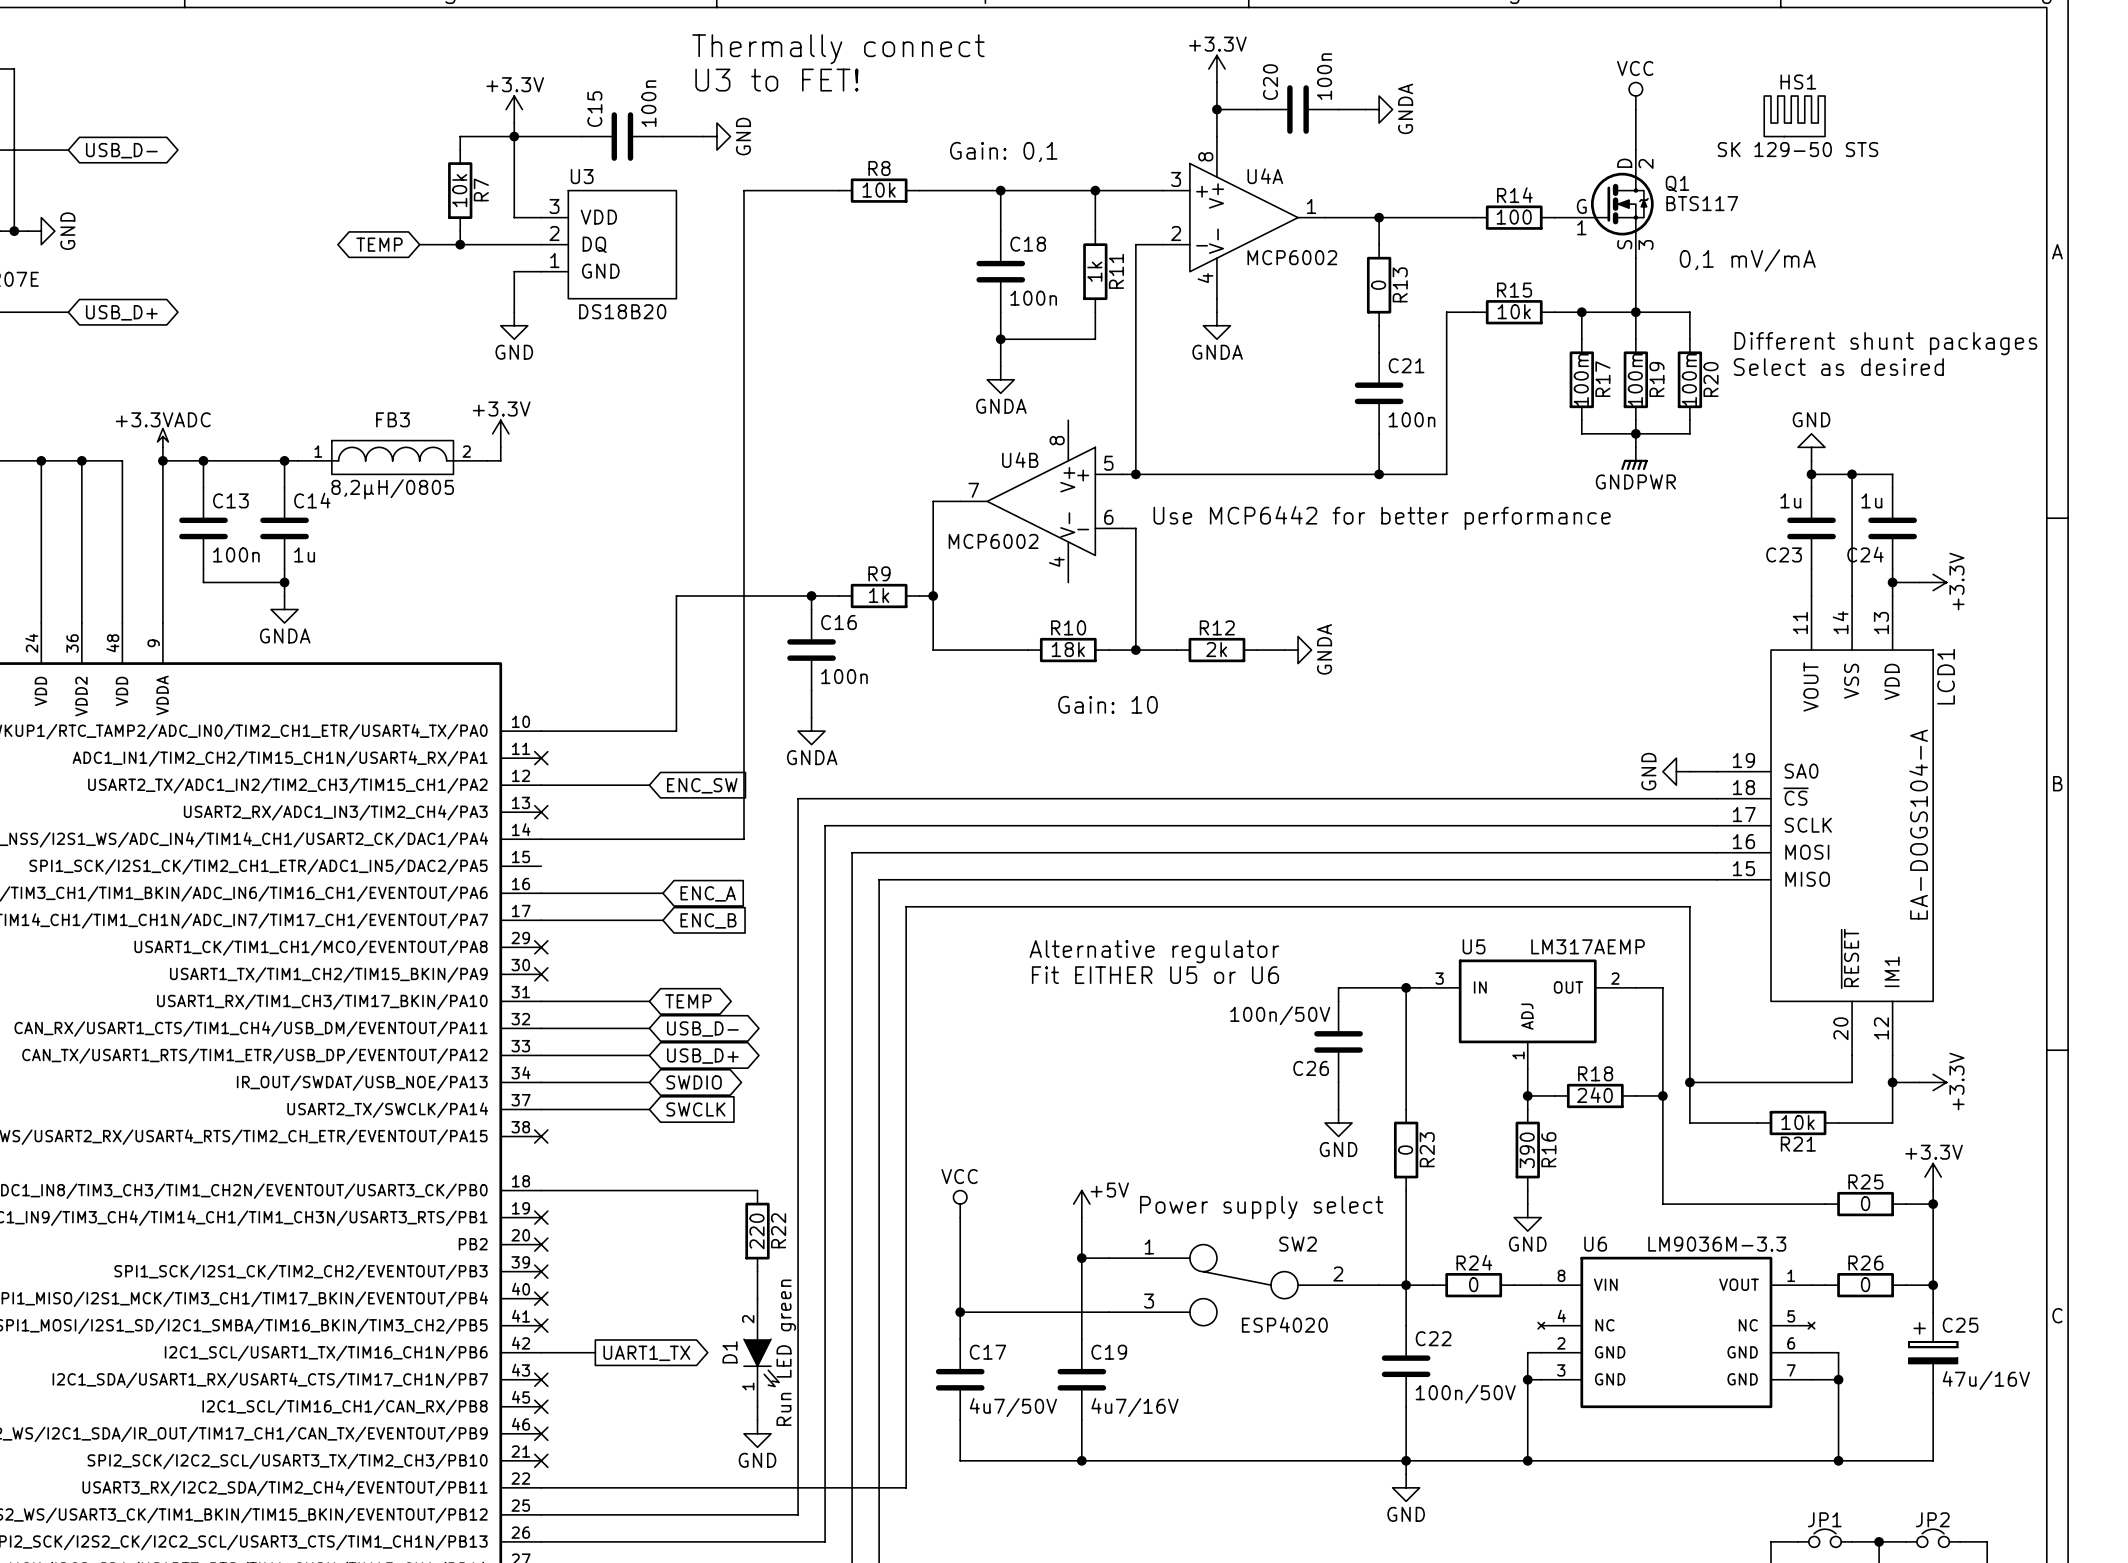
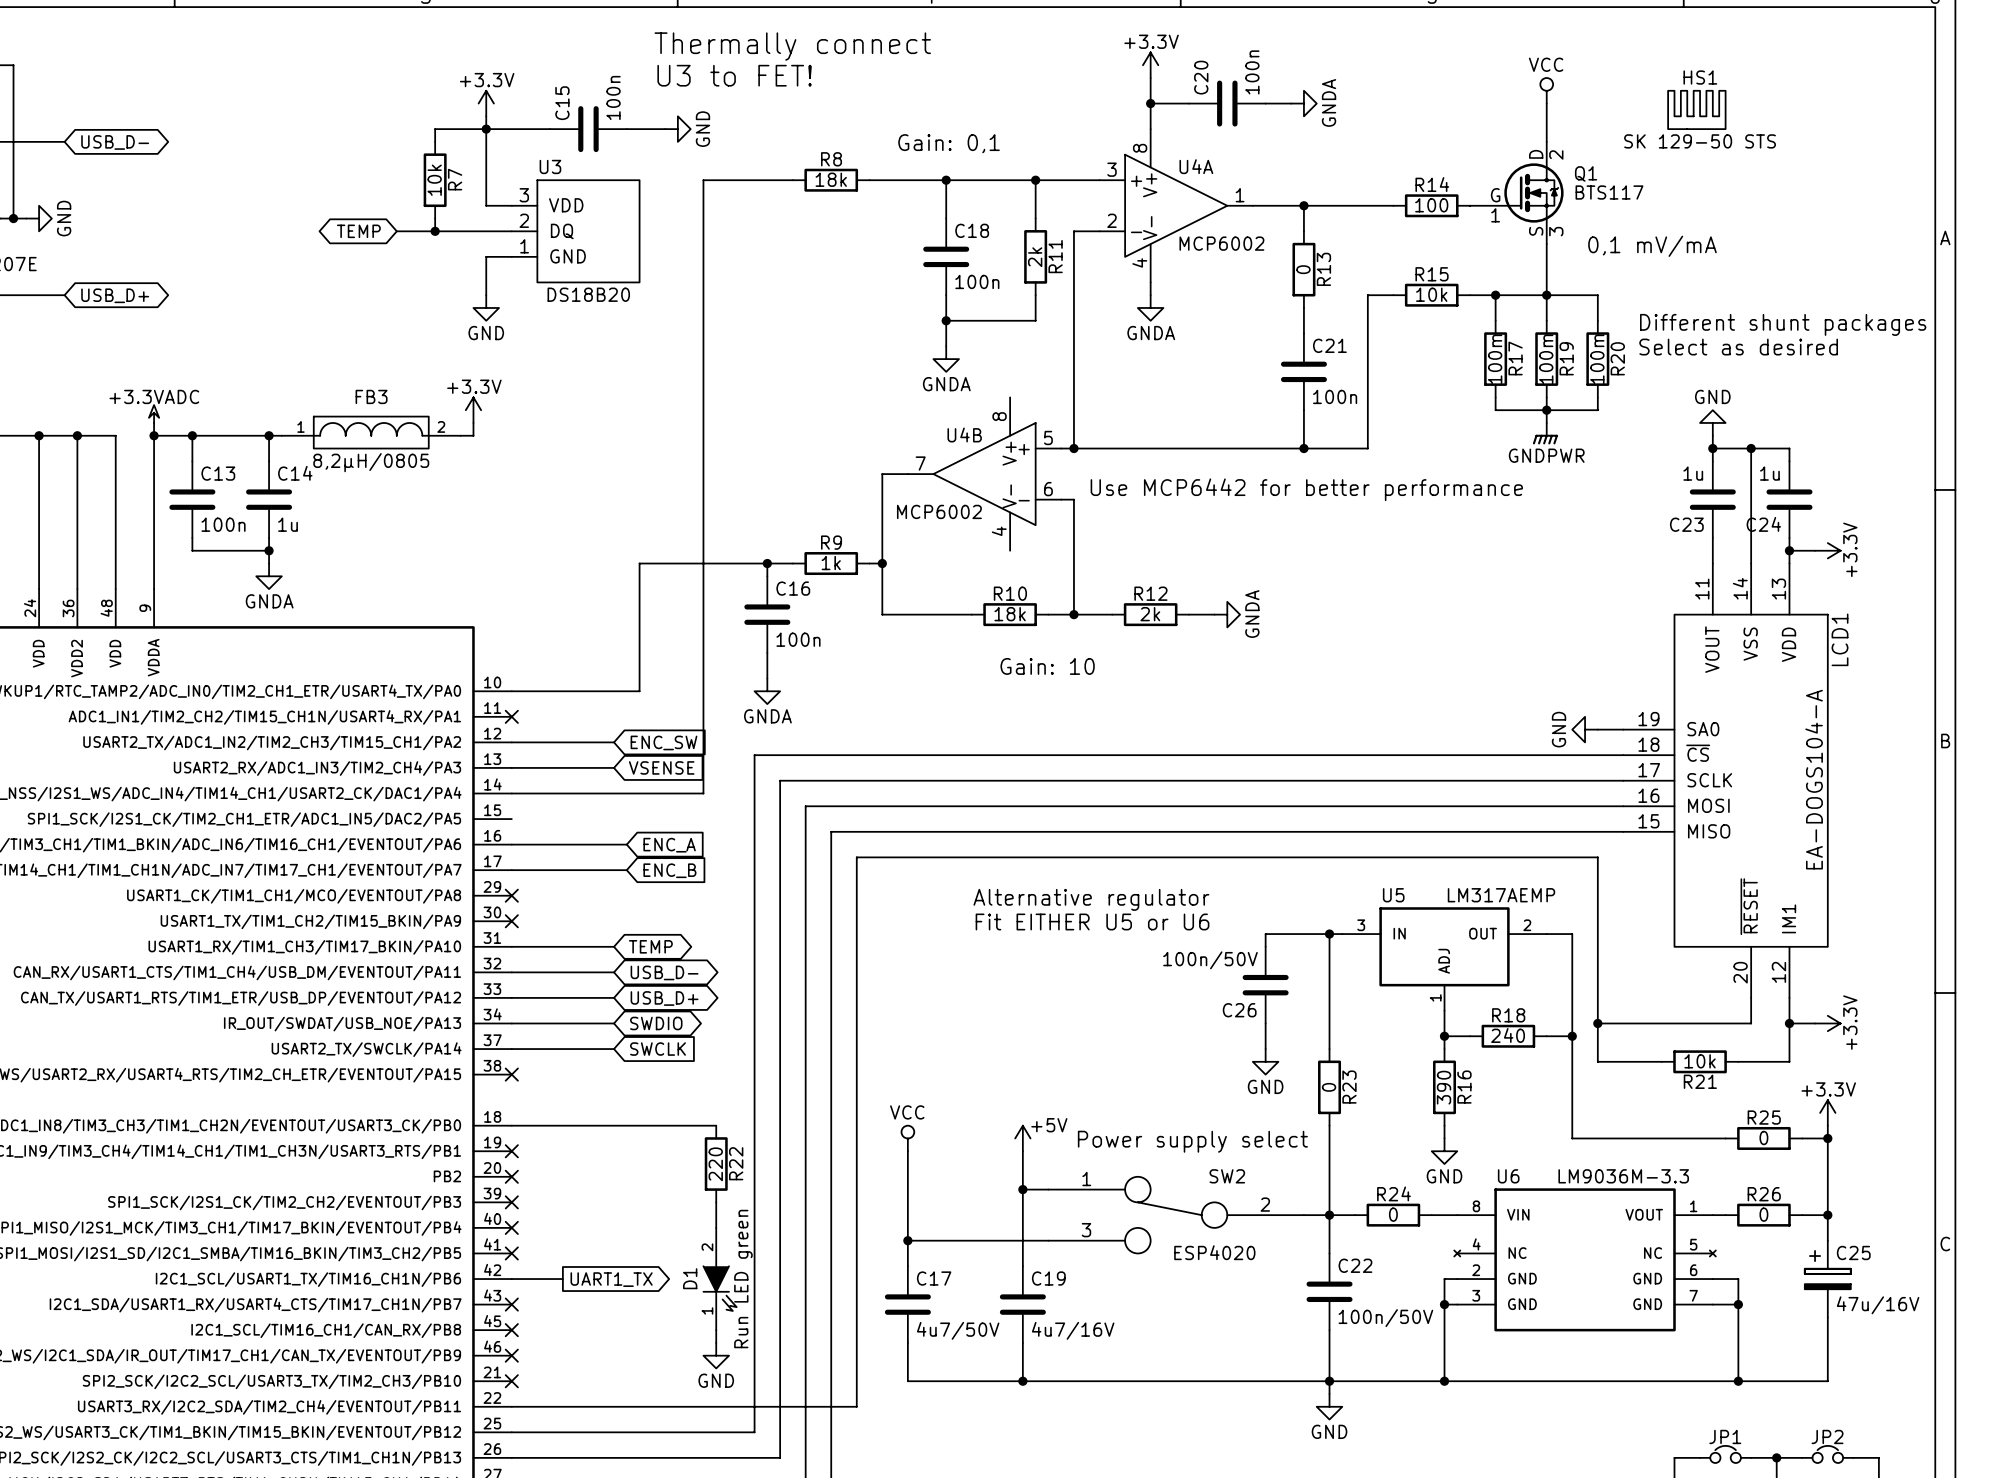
R8 value: 10k (879, 190) -> 18k (831, 179)
R11 value: 1k (1094, 271) -> 2k (1035, 257)
wire: none -> (511, 767) (614, 767)
no-connect mark: (541, 812) -> none
global label: none -> VSENSE (661, 767)

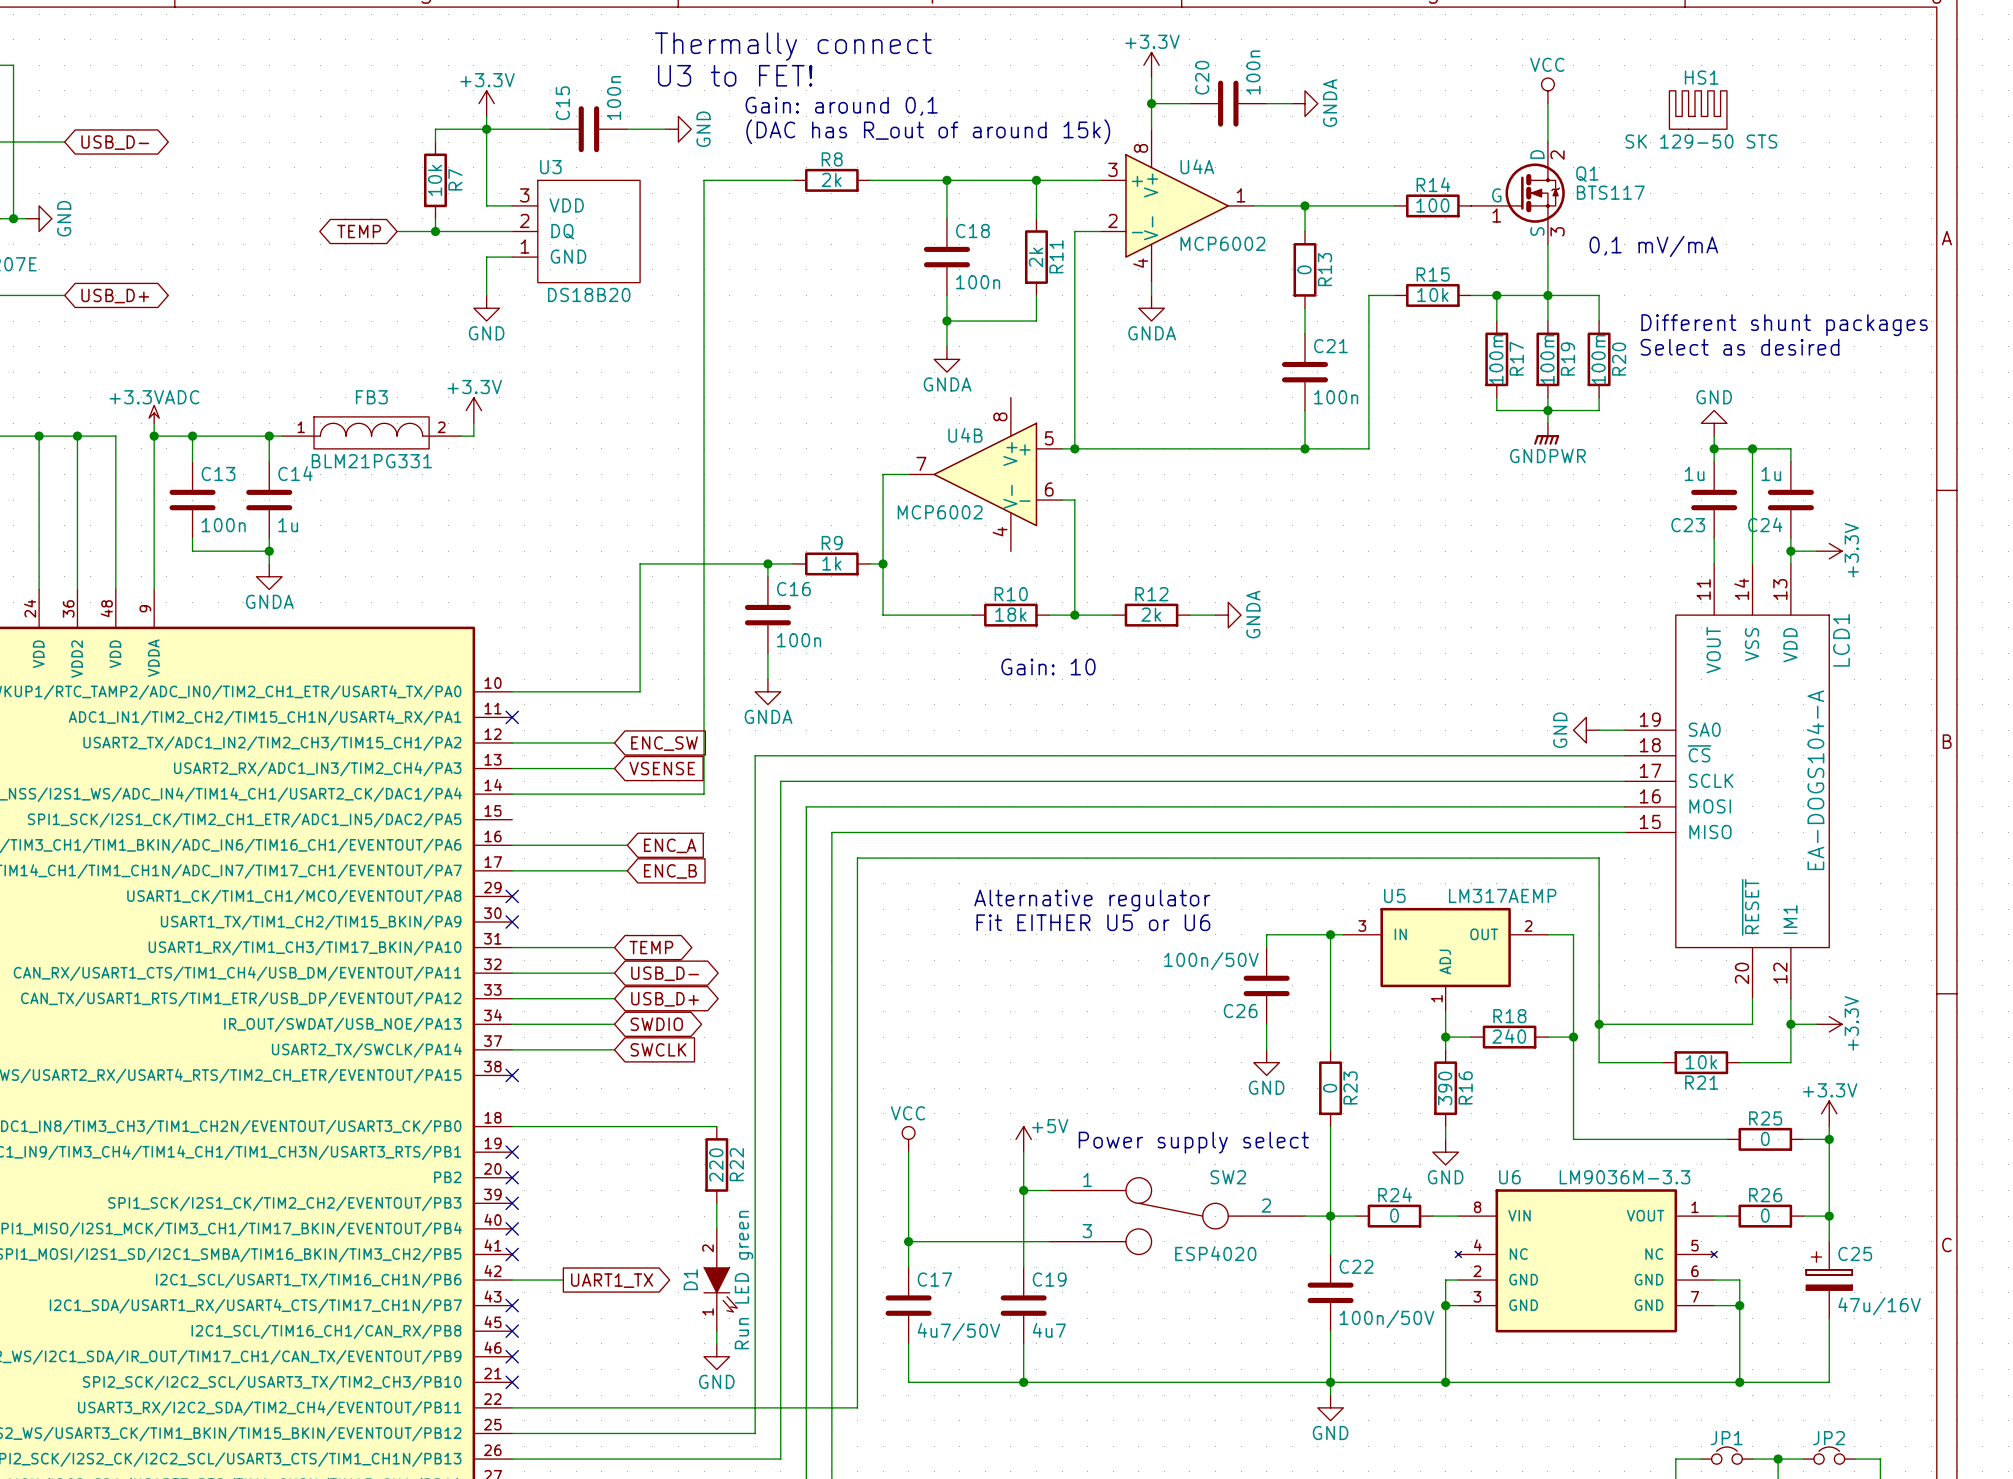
text: none -> Gain: around 0,1 (841, 106)
text: none -> (DAC has R_out of around 15k) (928, 131)
text: Gain: 0,1 (949, 143) -> none
R8 value: 18k (831, 179) -> 2k (831, 179)
FB3 value: 8,2µH/0805 (371, 462) -> BLM21PG331 (371, 461)
text: Use MCP6442 for better performance (1306, 489) -> none
C19 value: 4u7/16V (1073, 1330) -> 4u7 (1049, 1330)

